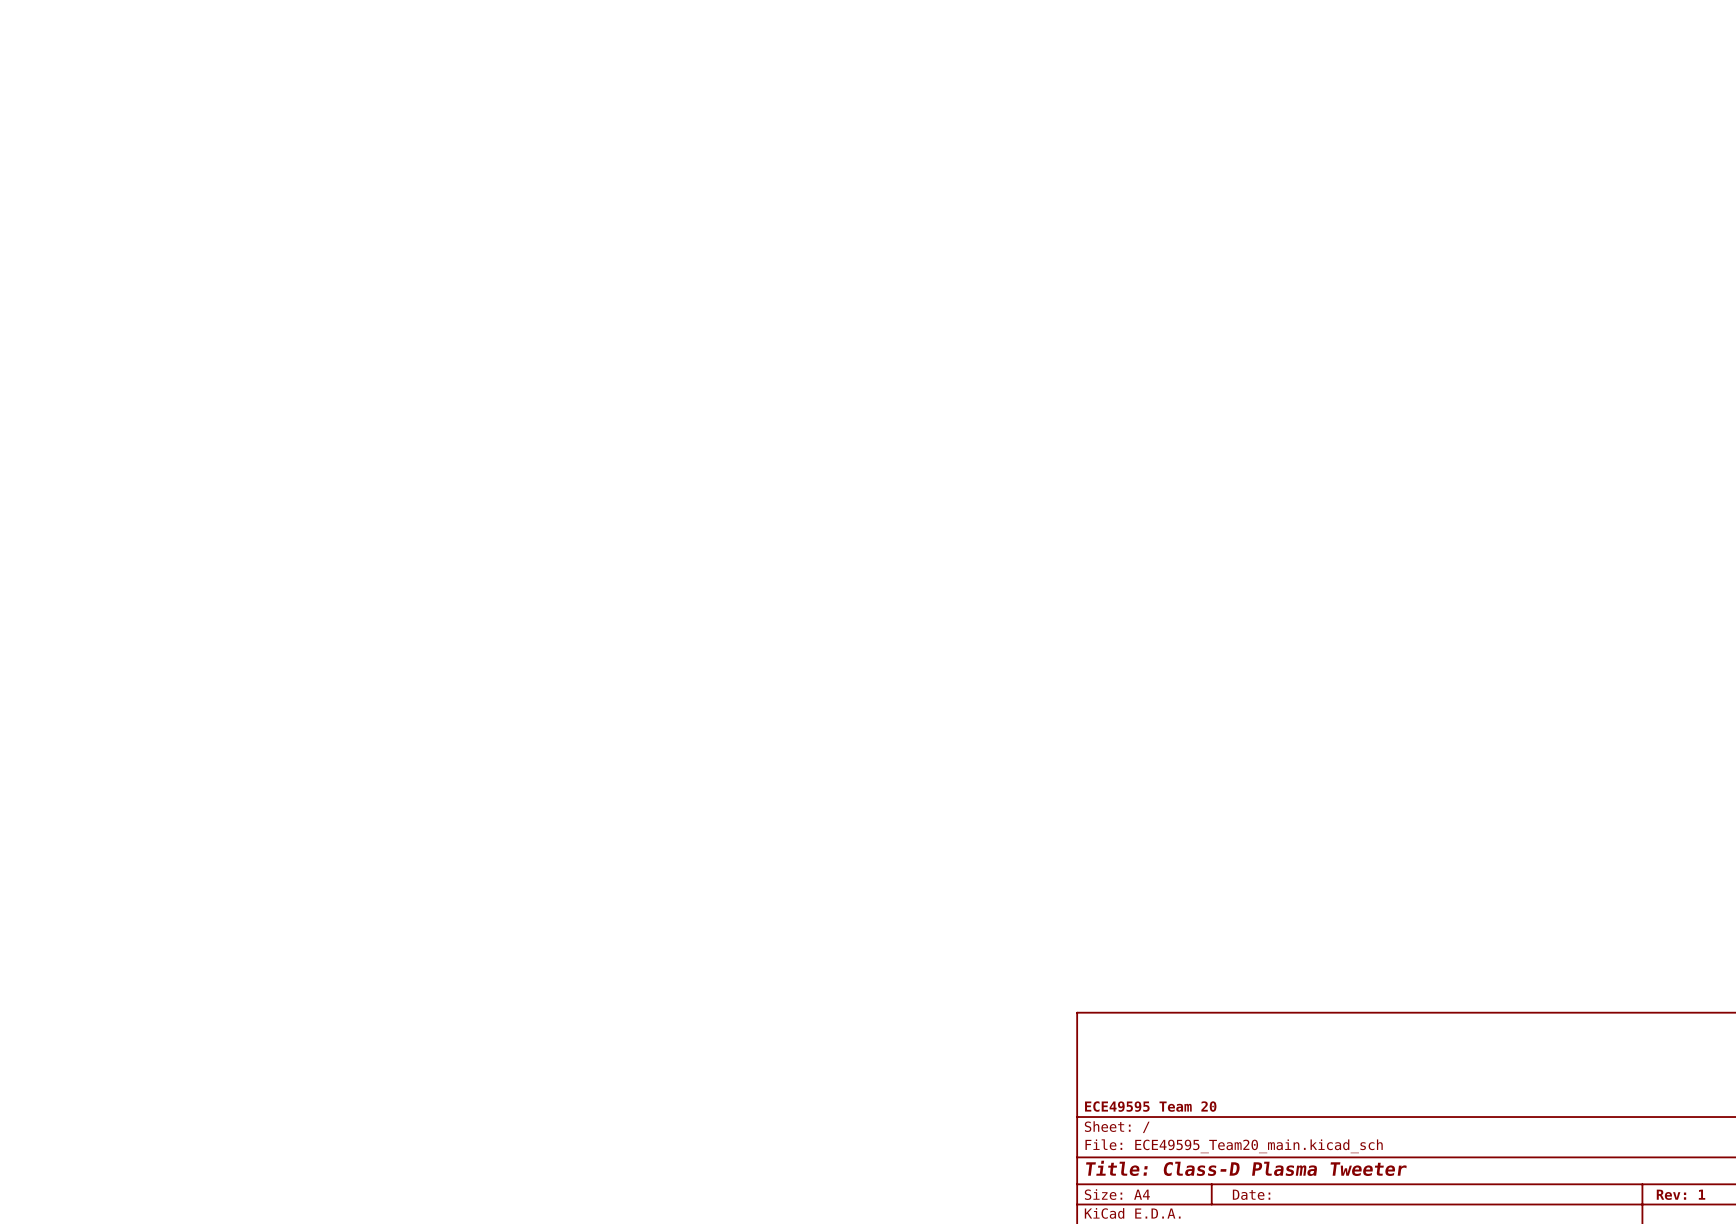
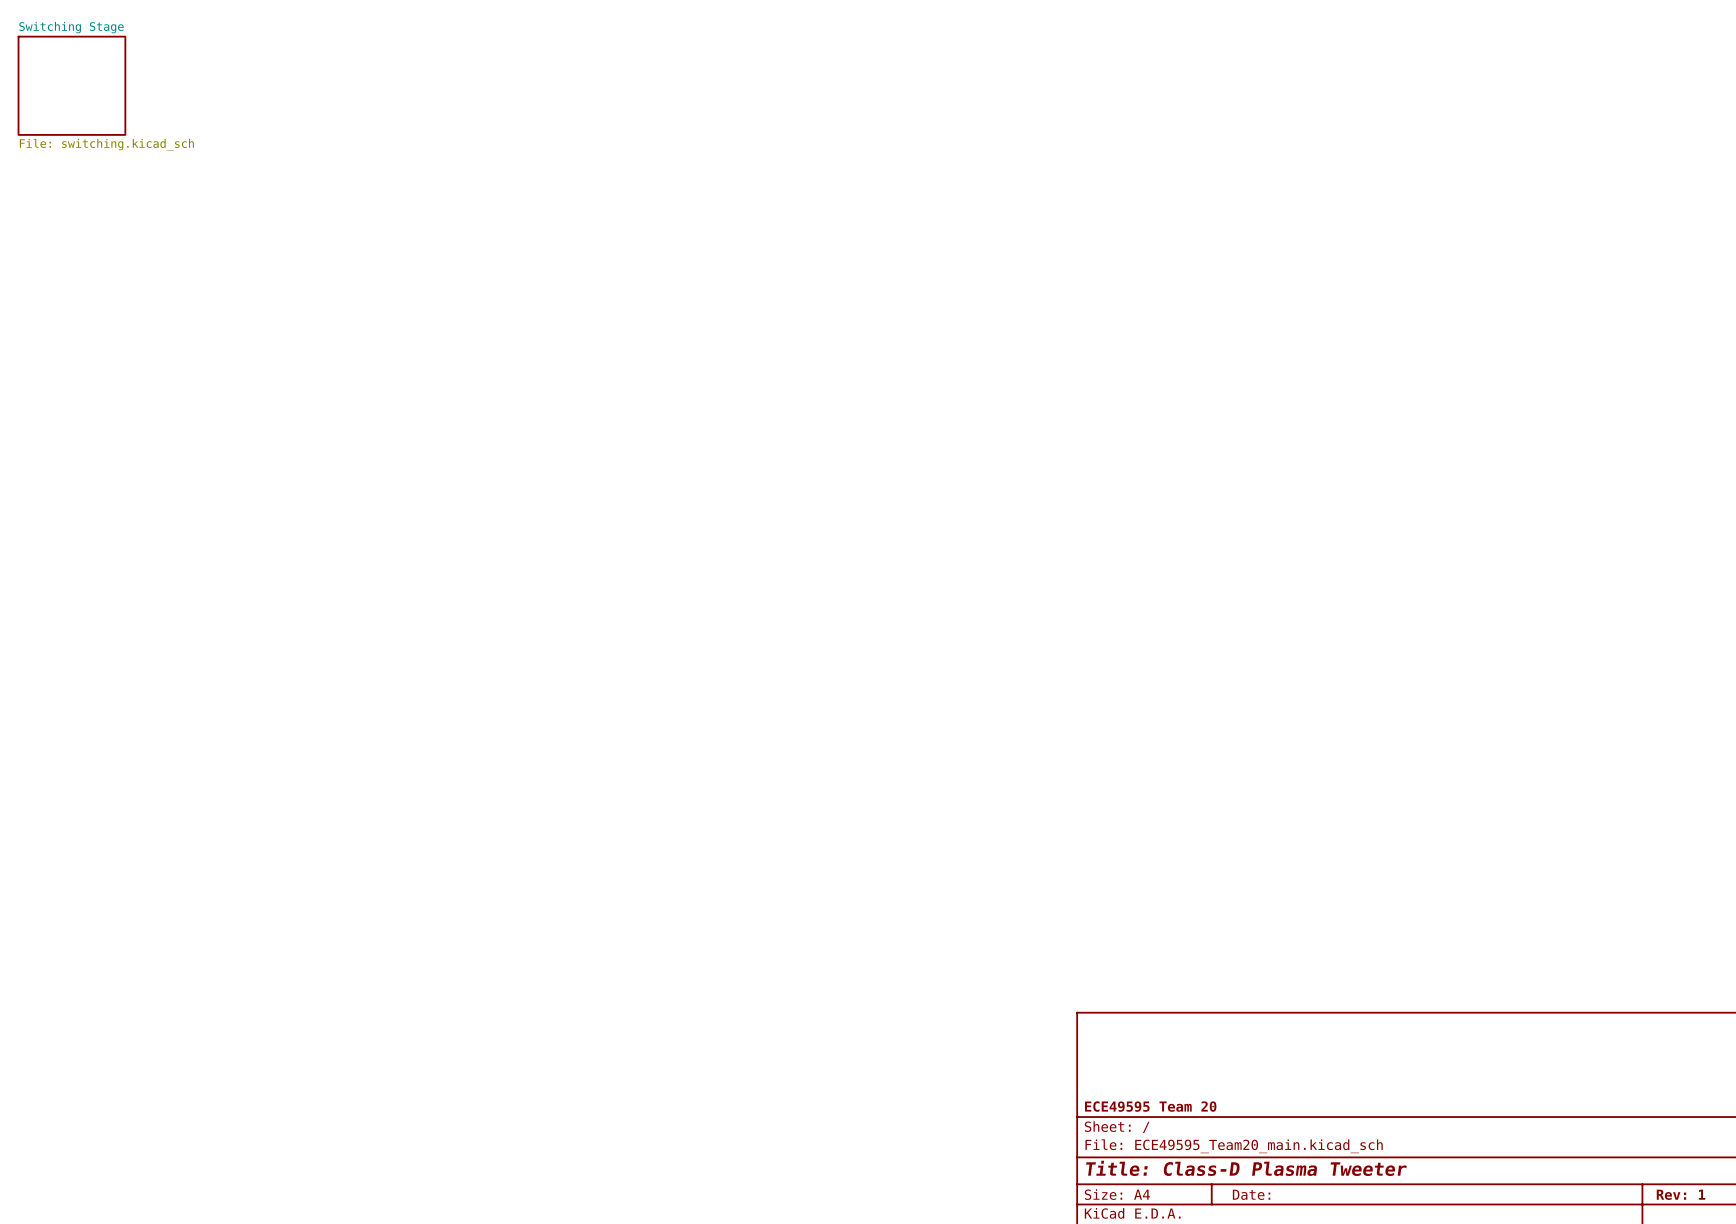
sheet Switching Stage: none -> File: switching.kicad_sch (71, 85)

